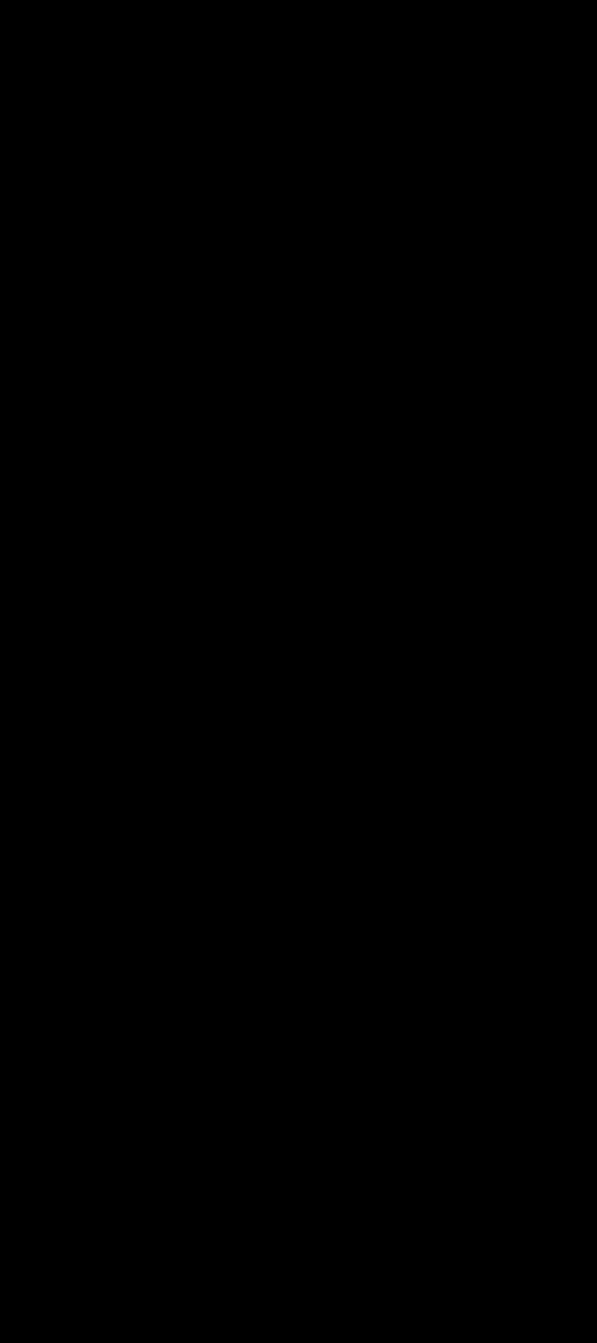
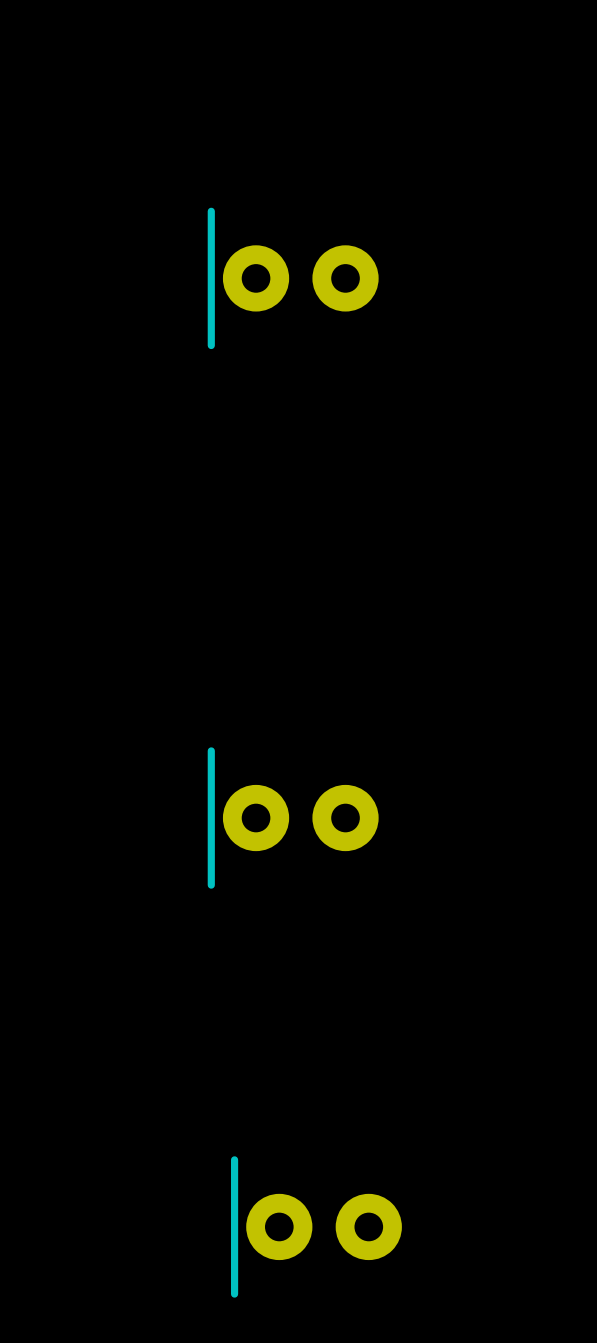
part: none -> (293, 278)
part: none -> (293, 818)
part: none -> (316, 1226)

